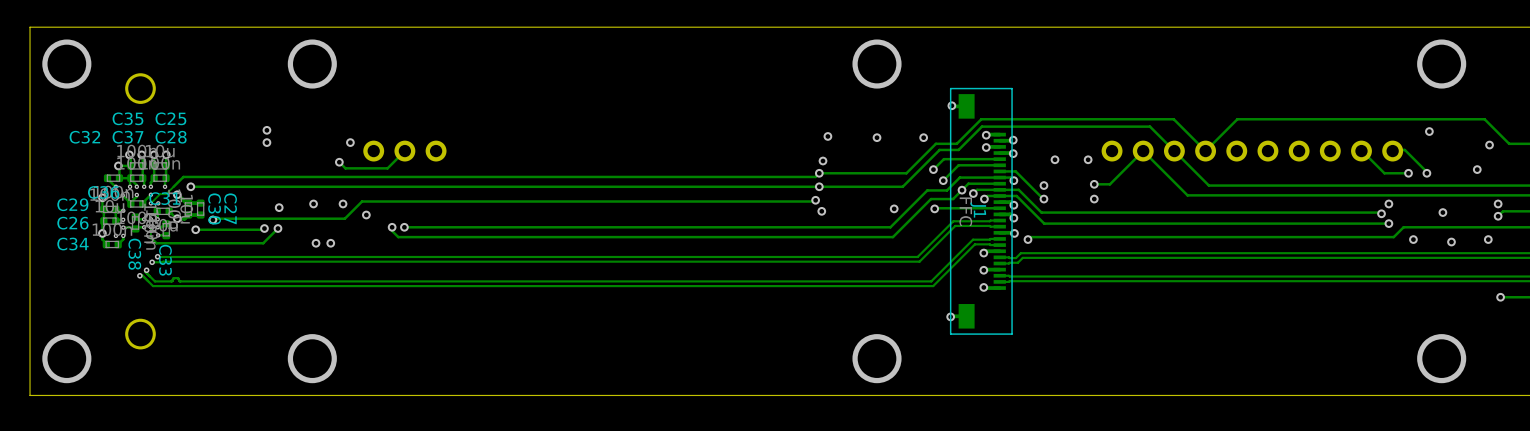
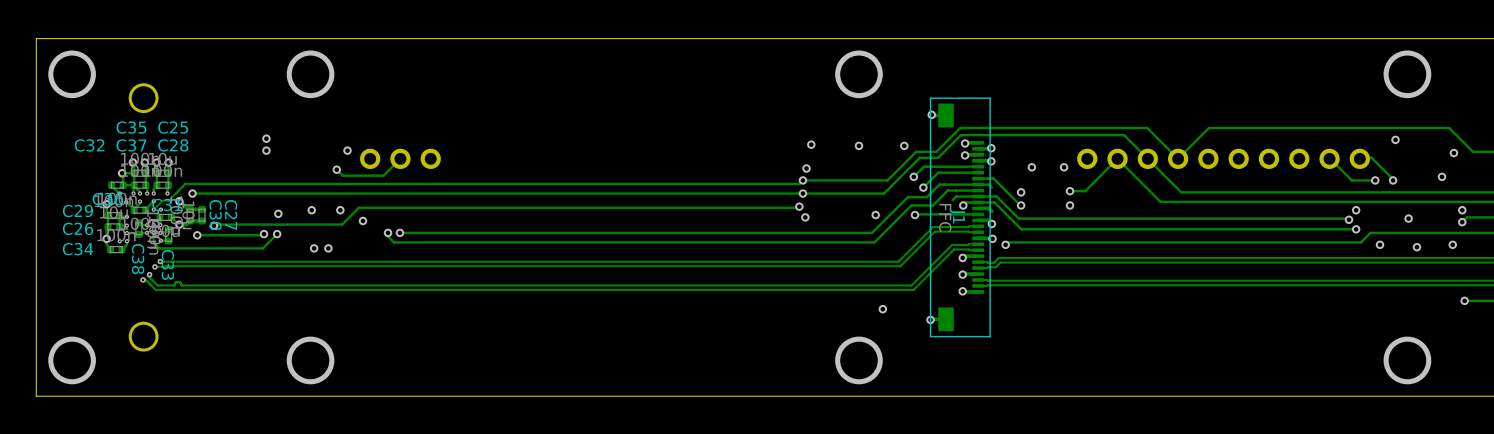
via: (1013, 180) -> none
via: (962, 190) -> none
via: (973, 193) -> none
via: (1013, 205) -> none
via: none -> (882, 309)

